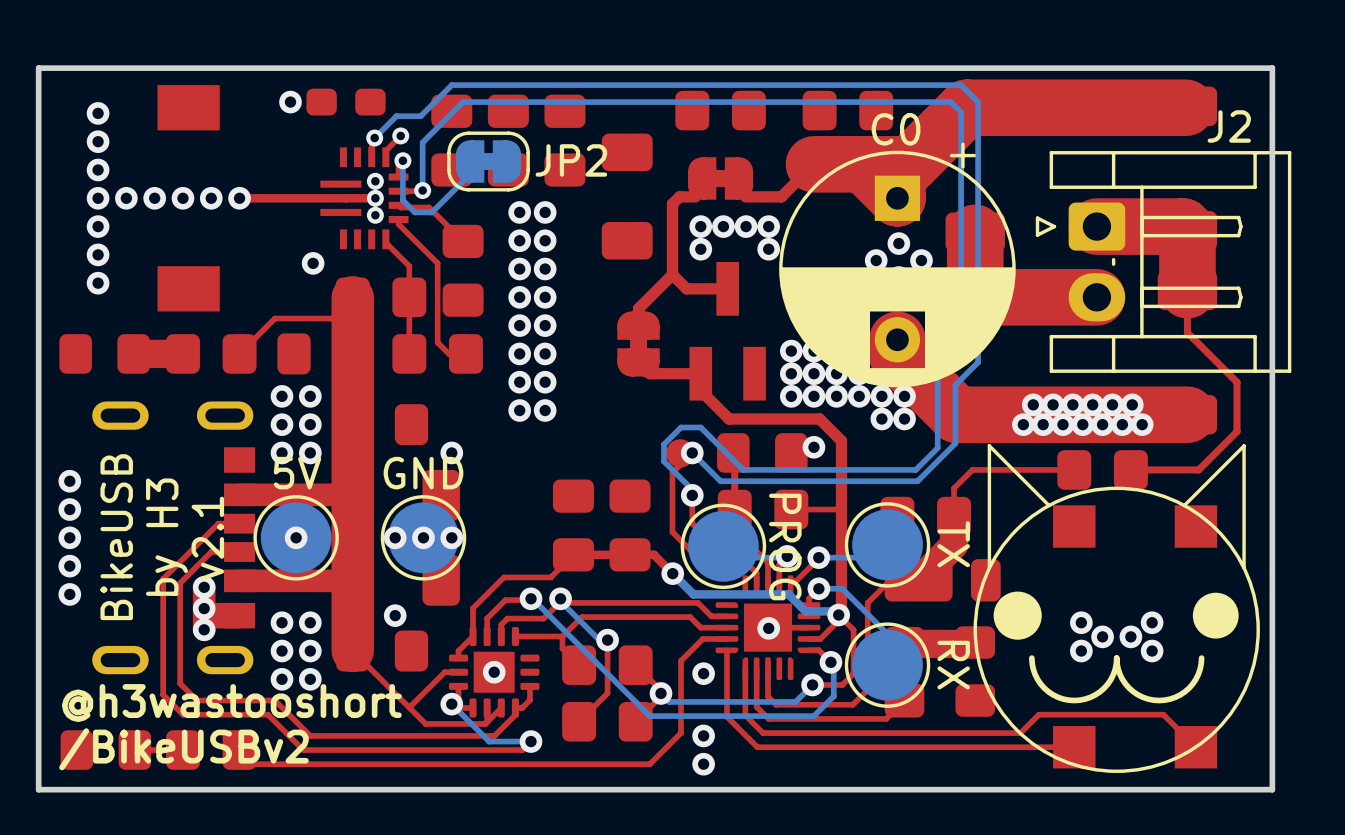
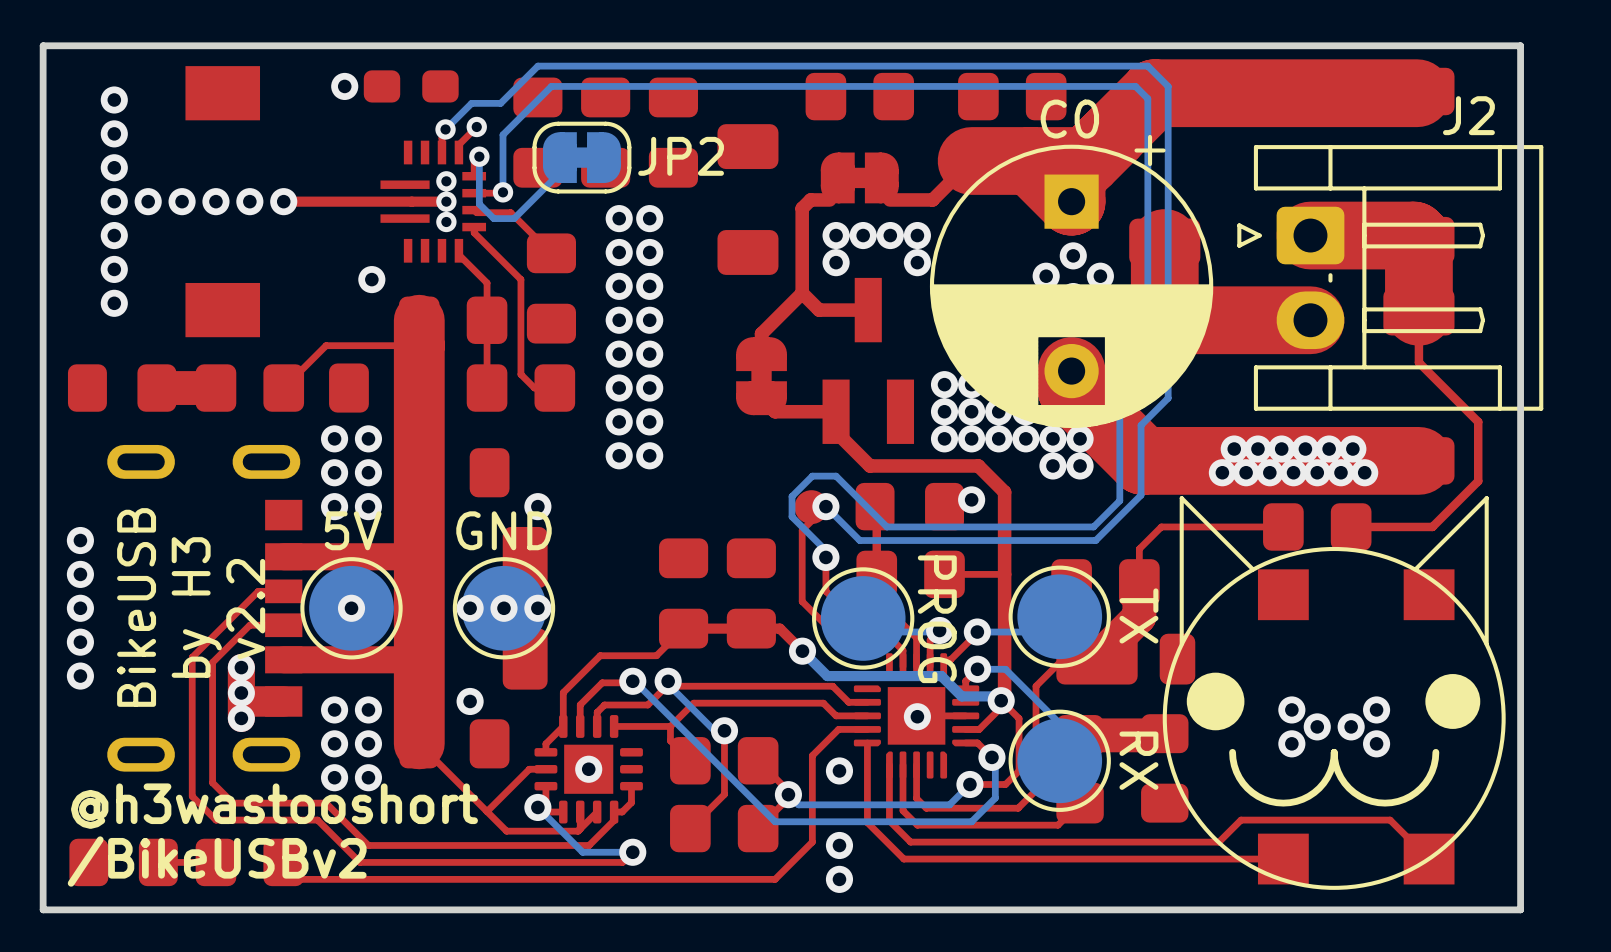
text: v2.1 (207, 538) -> v2.2 (245, 609)

